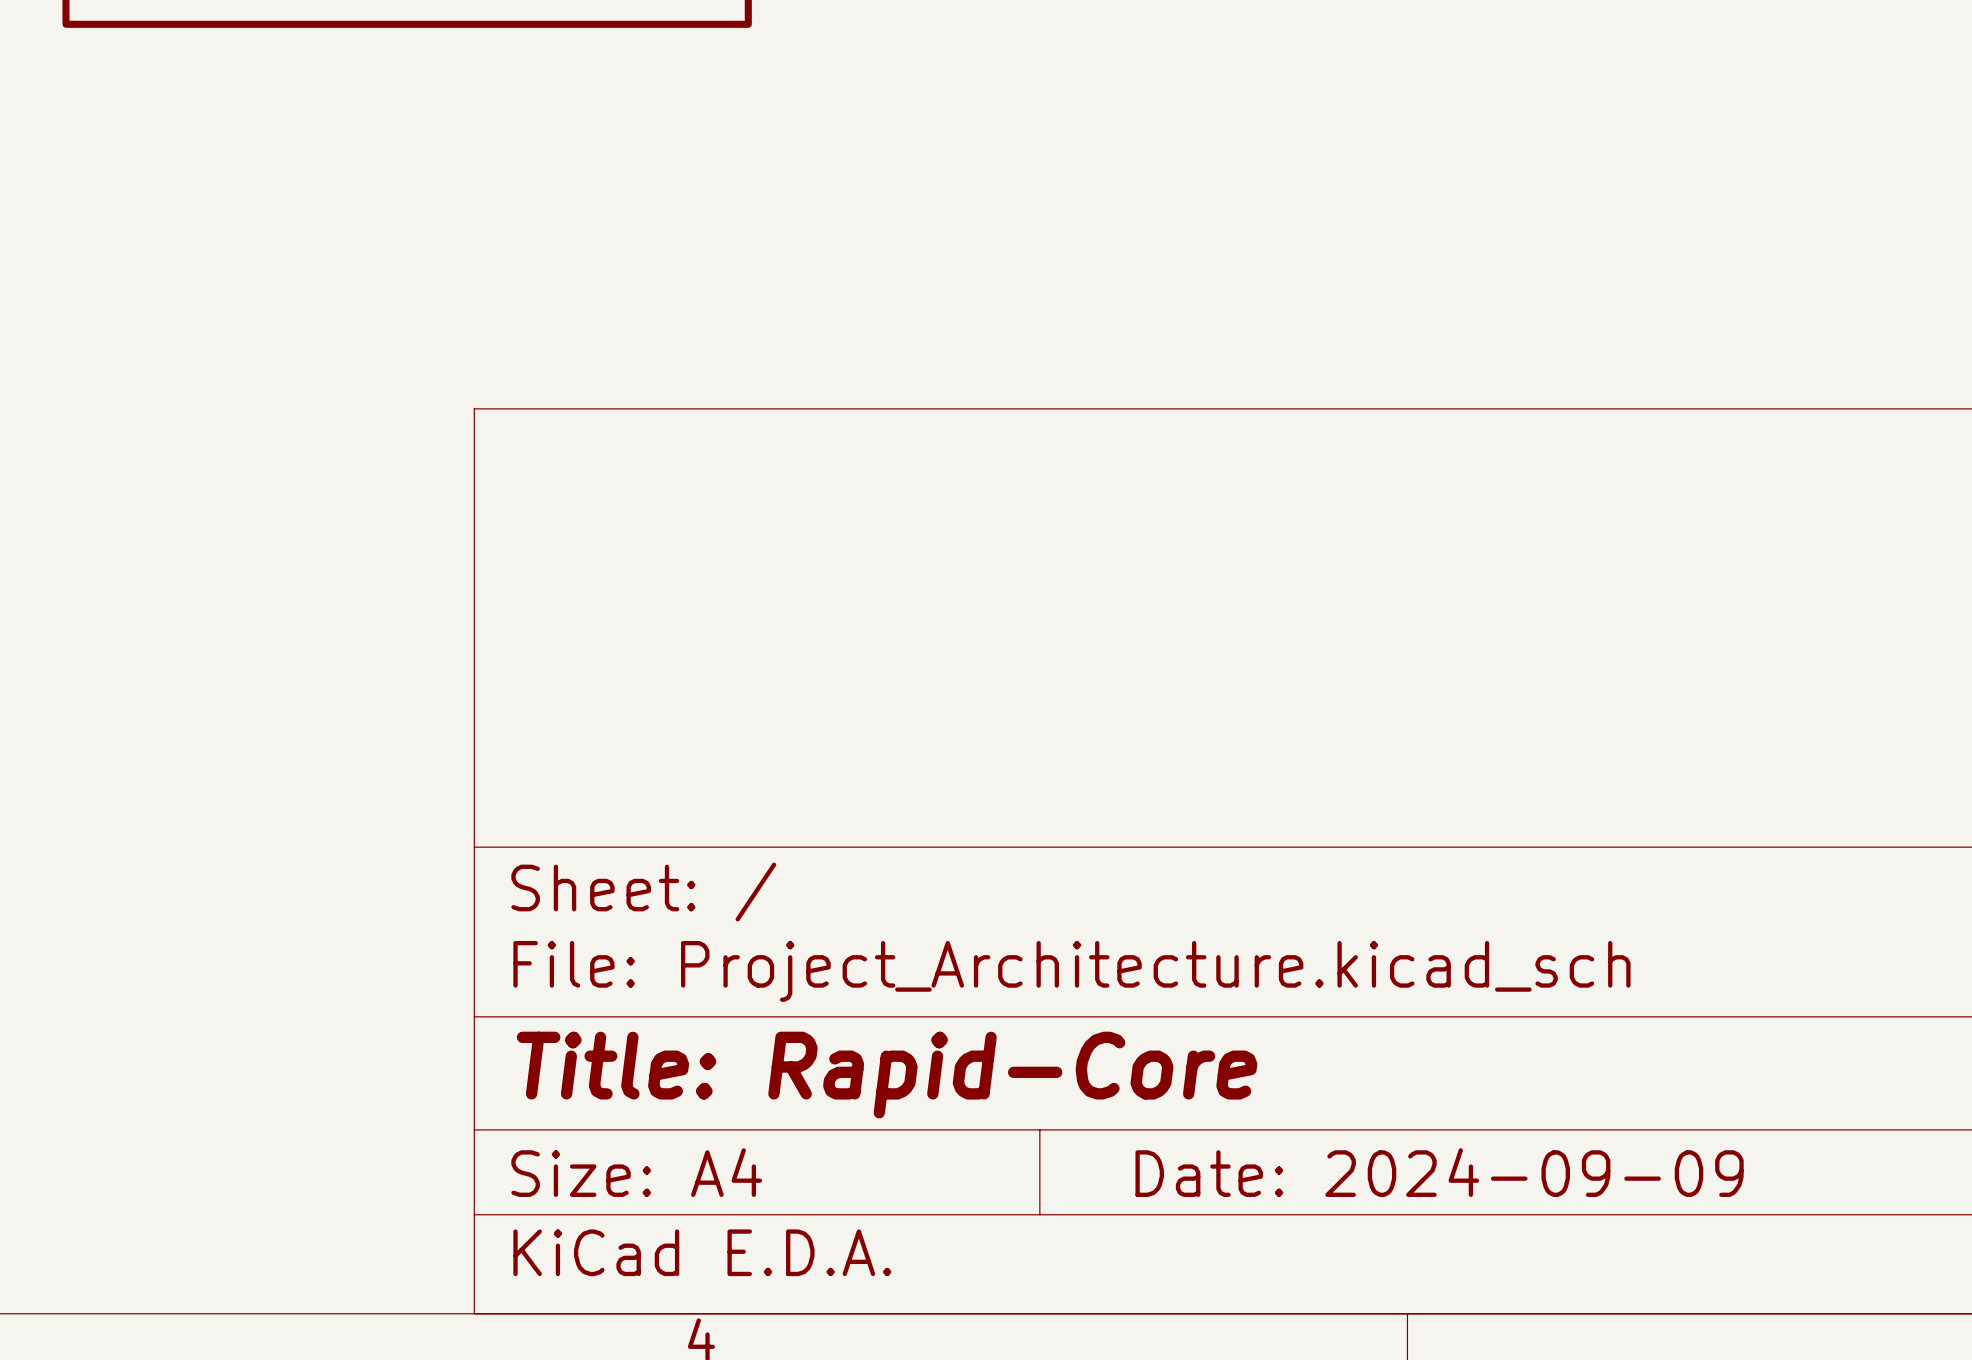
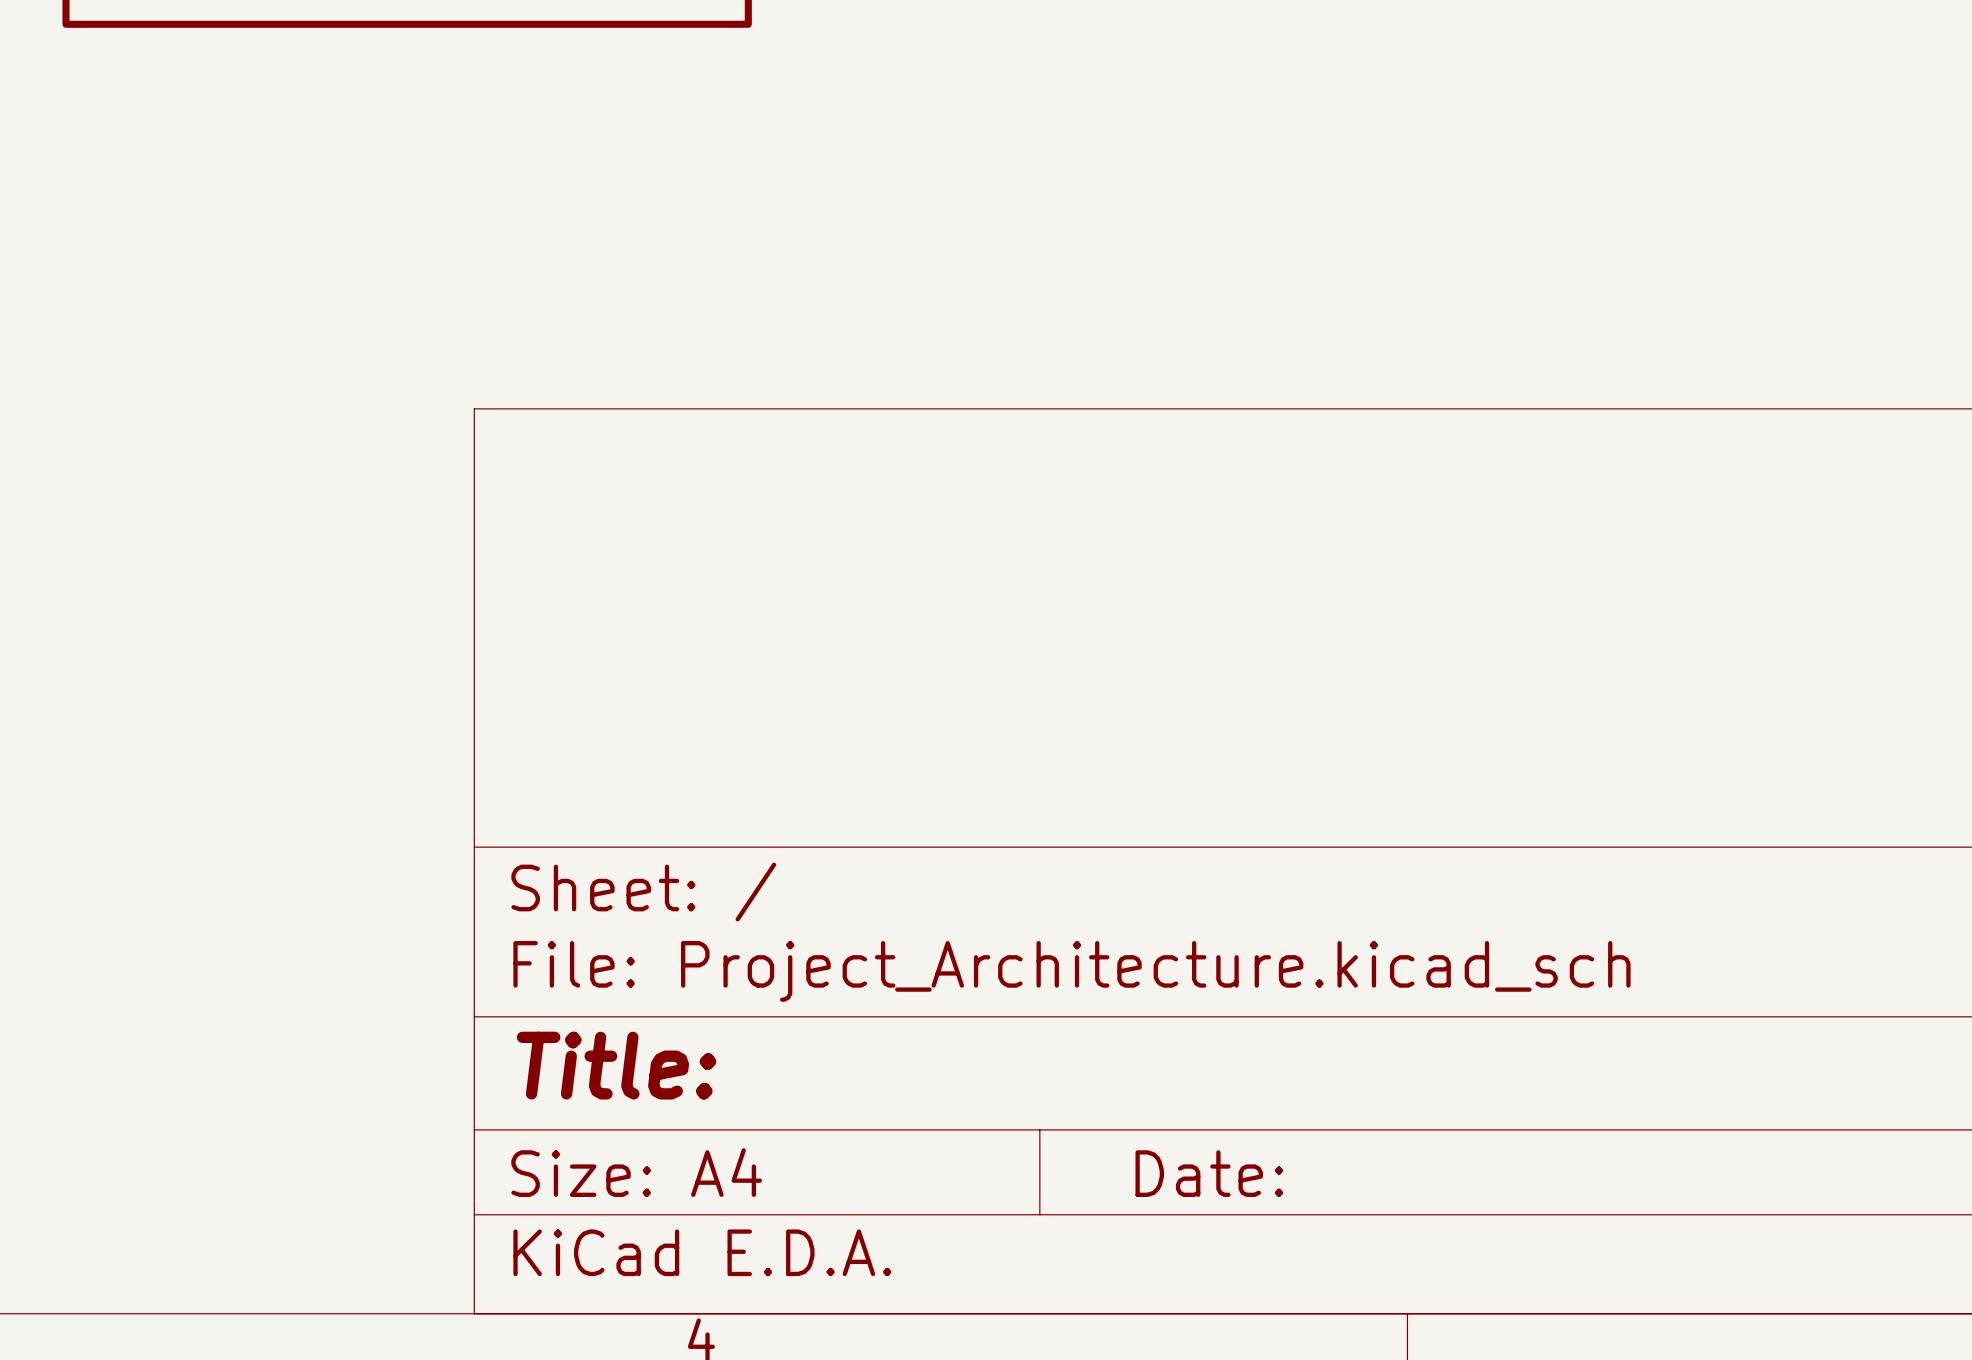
title block: Title: Rapid-Core (887, 1075) -> Title: (616, 1065)
title block: Date: 2024-09-09 (1439, 1172) -> Date: (1209, 1173)

